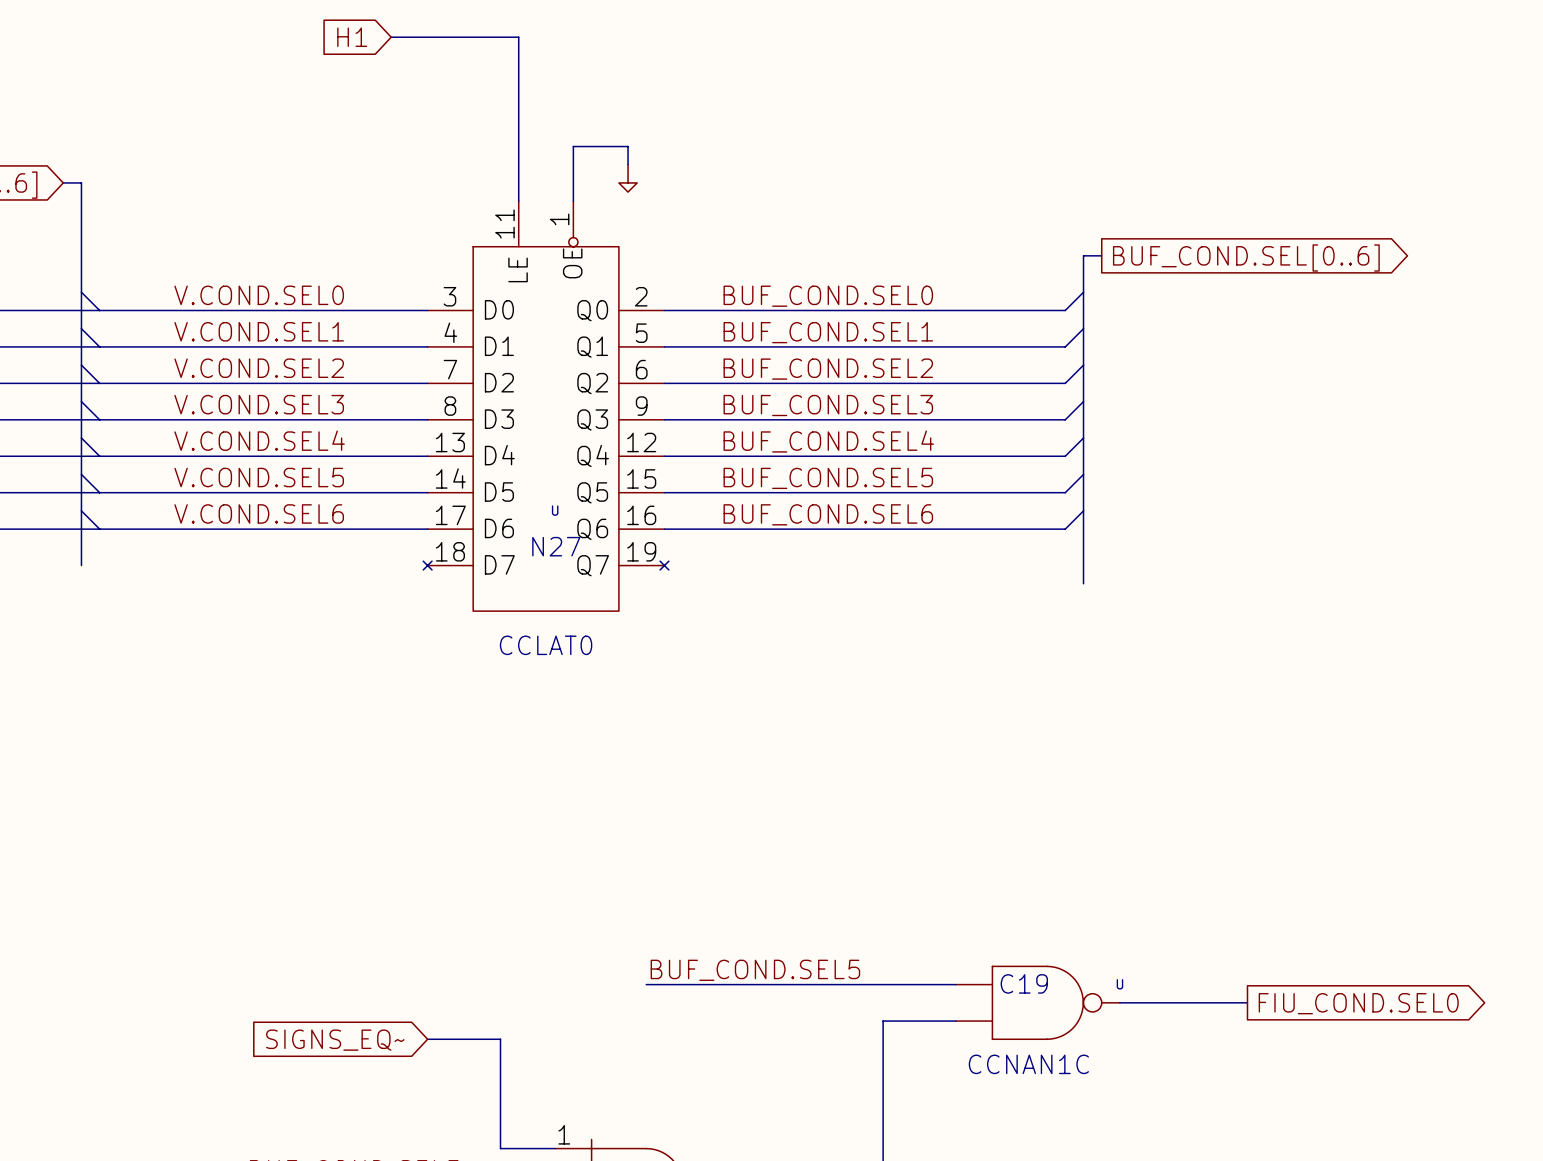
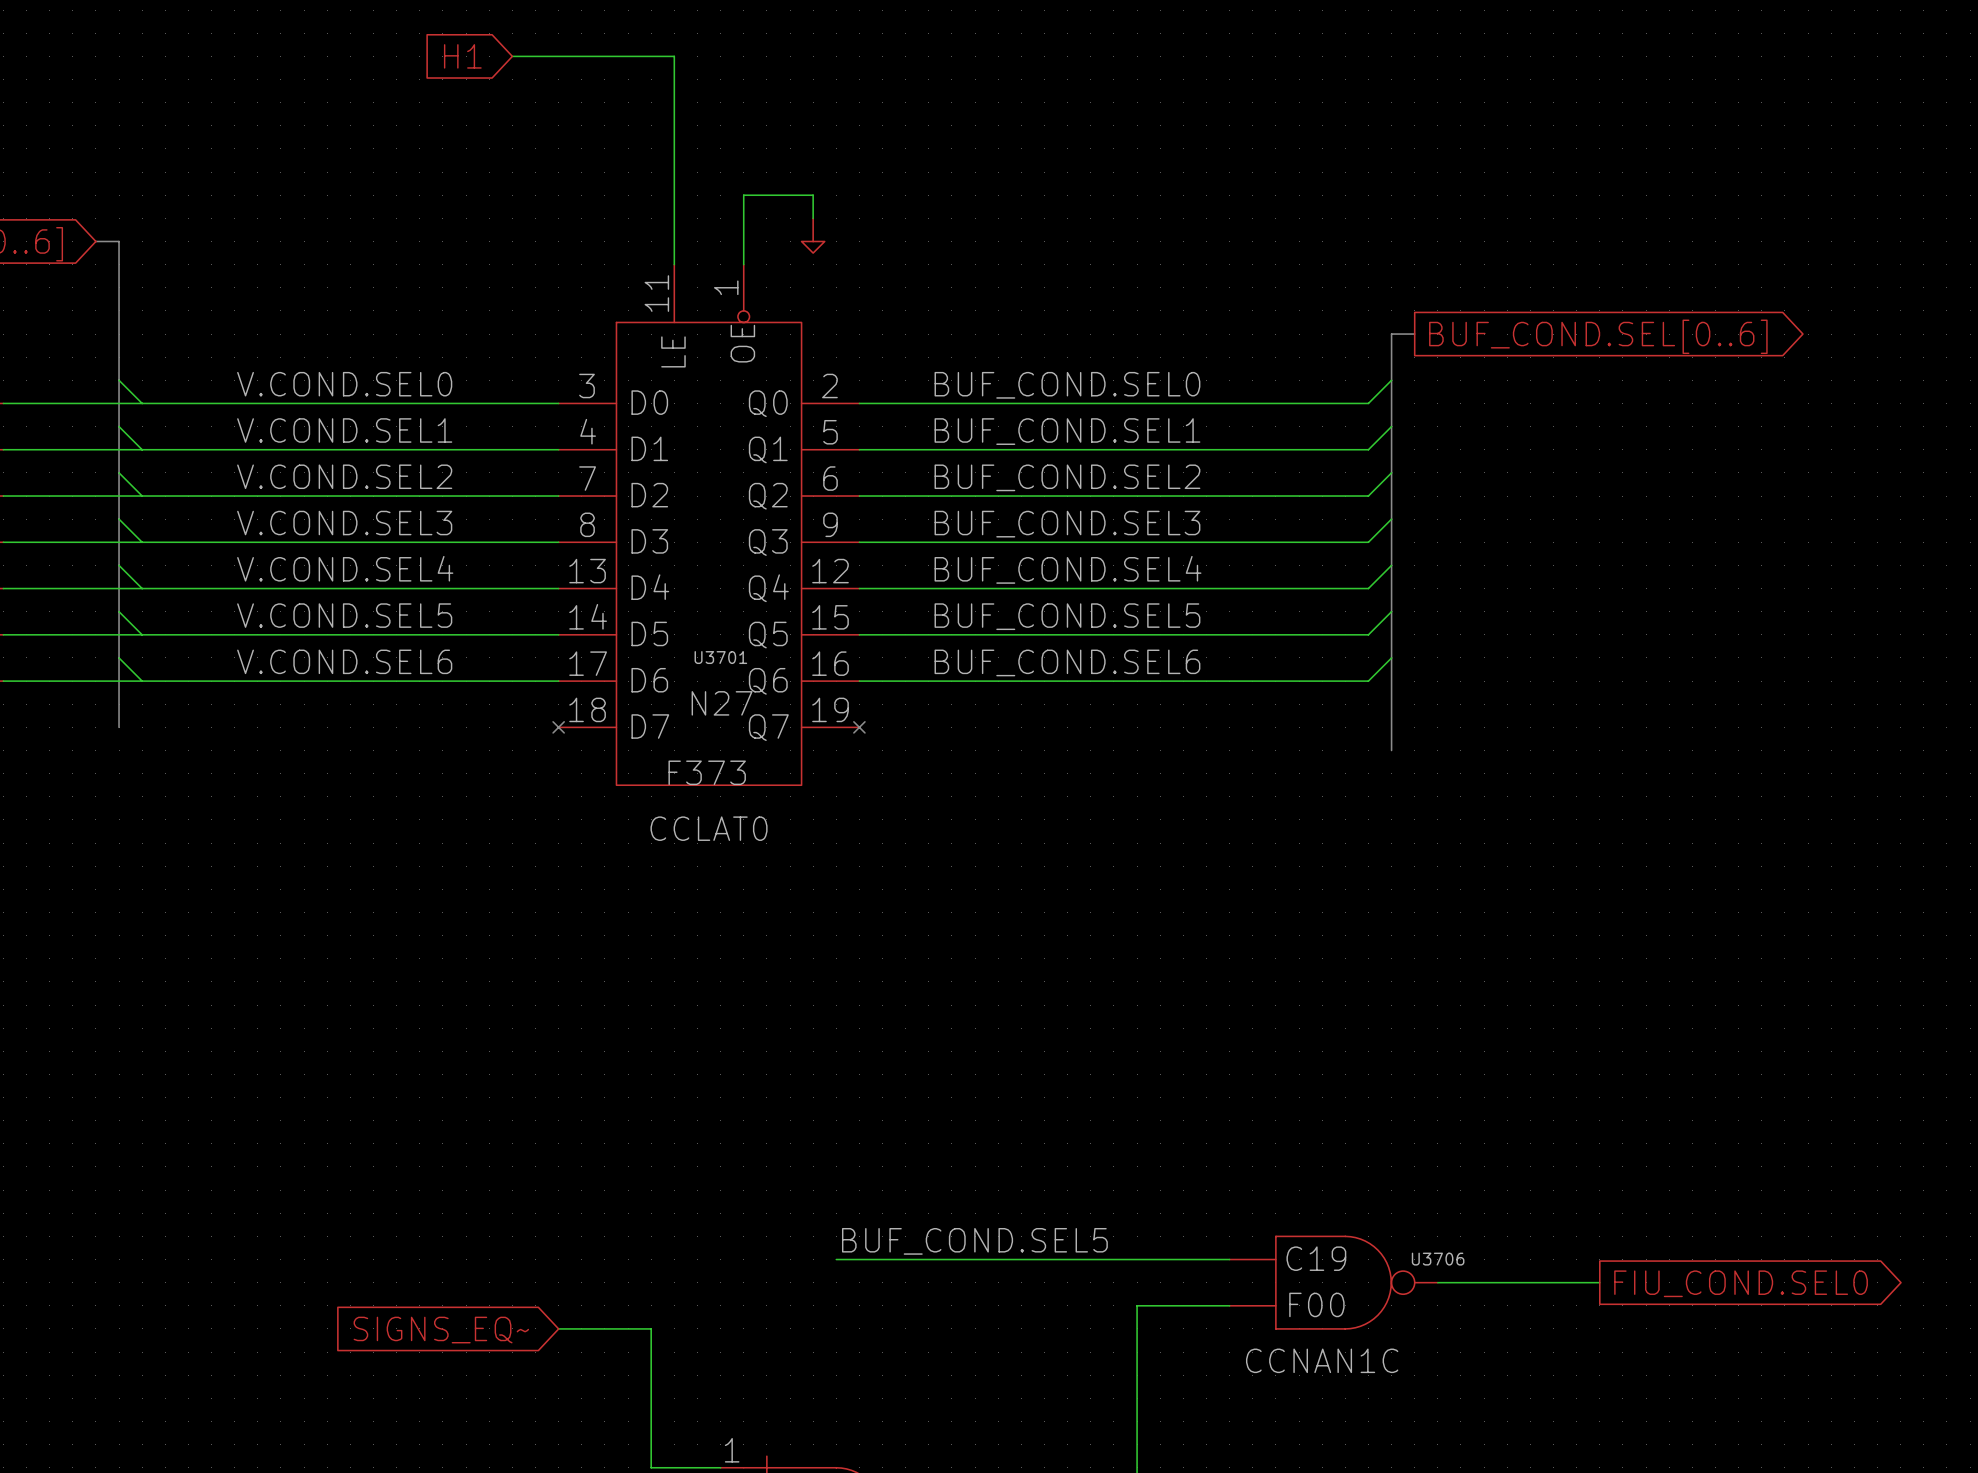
U name: U (555, 510) -> U3701 (720, 657)
U value: none -> F373 (707, 772)
U name: U (1119, 984) -> U3706 (1438, 1259)
U value: none -> F00 (1316, 1304)

